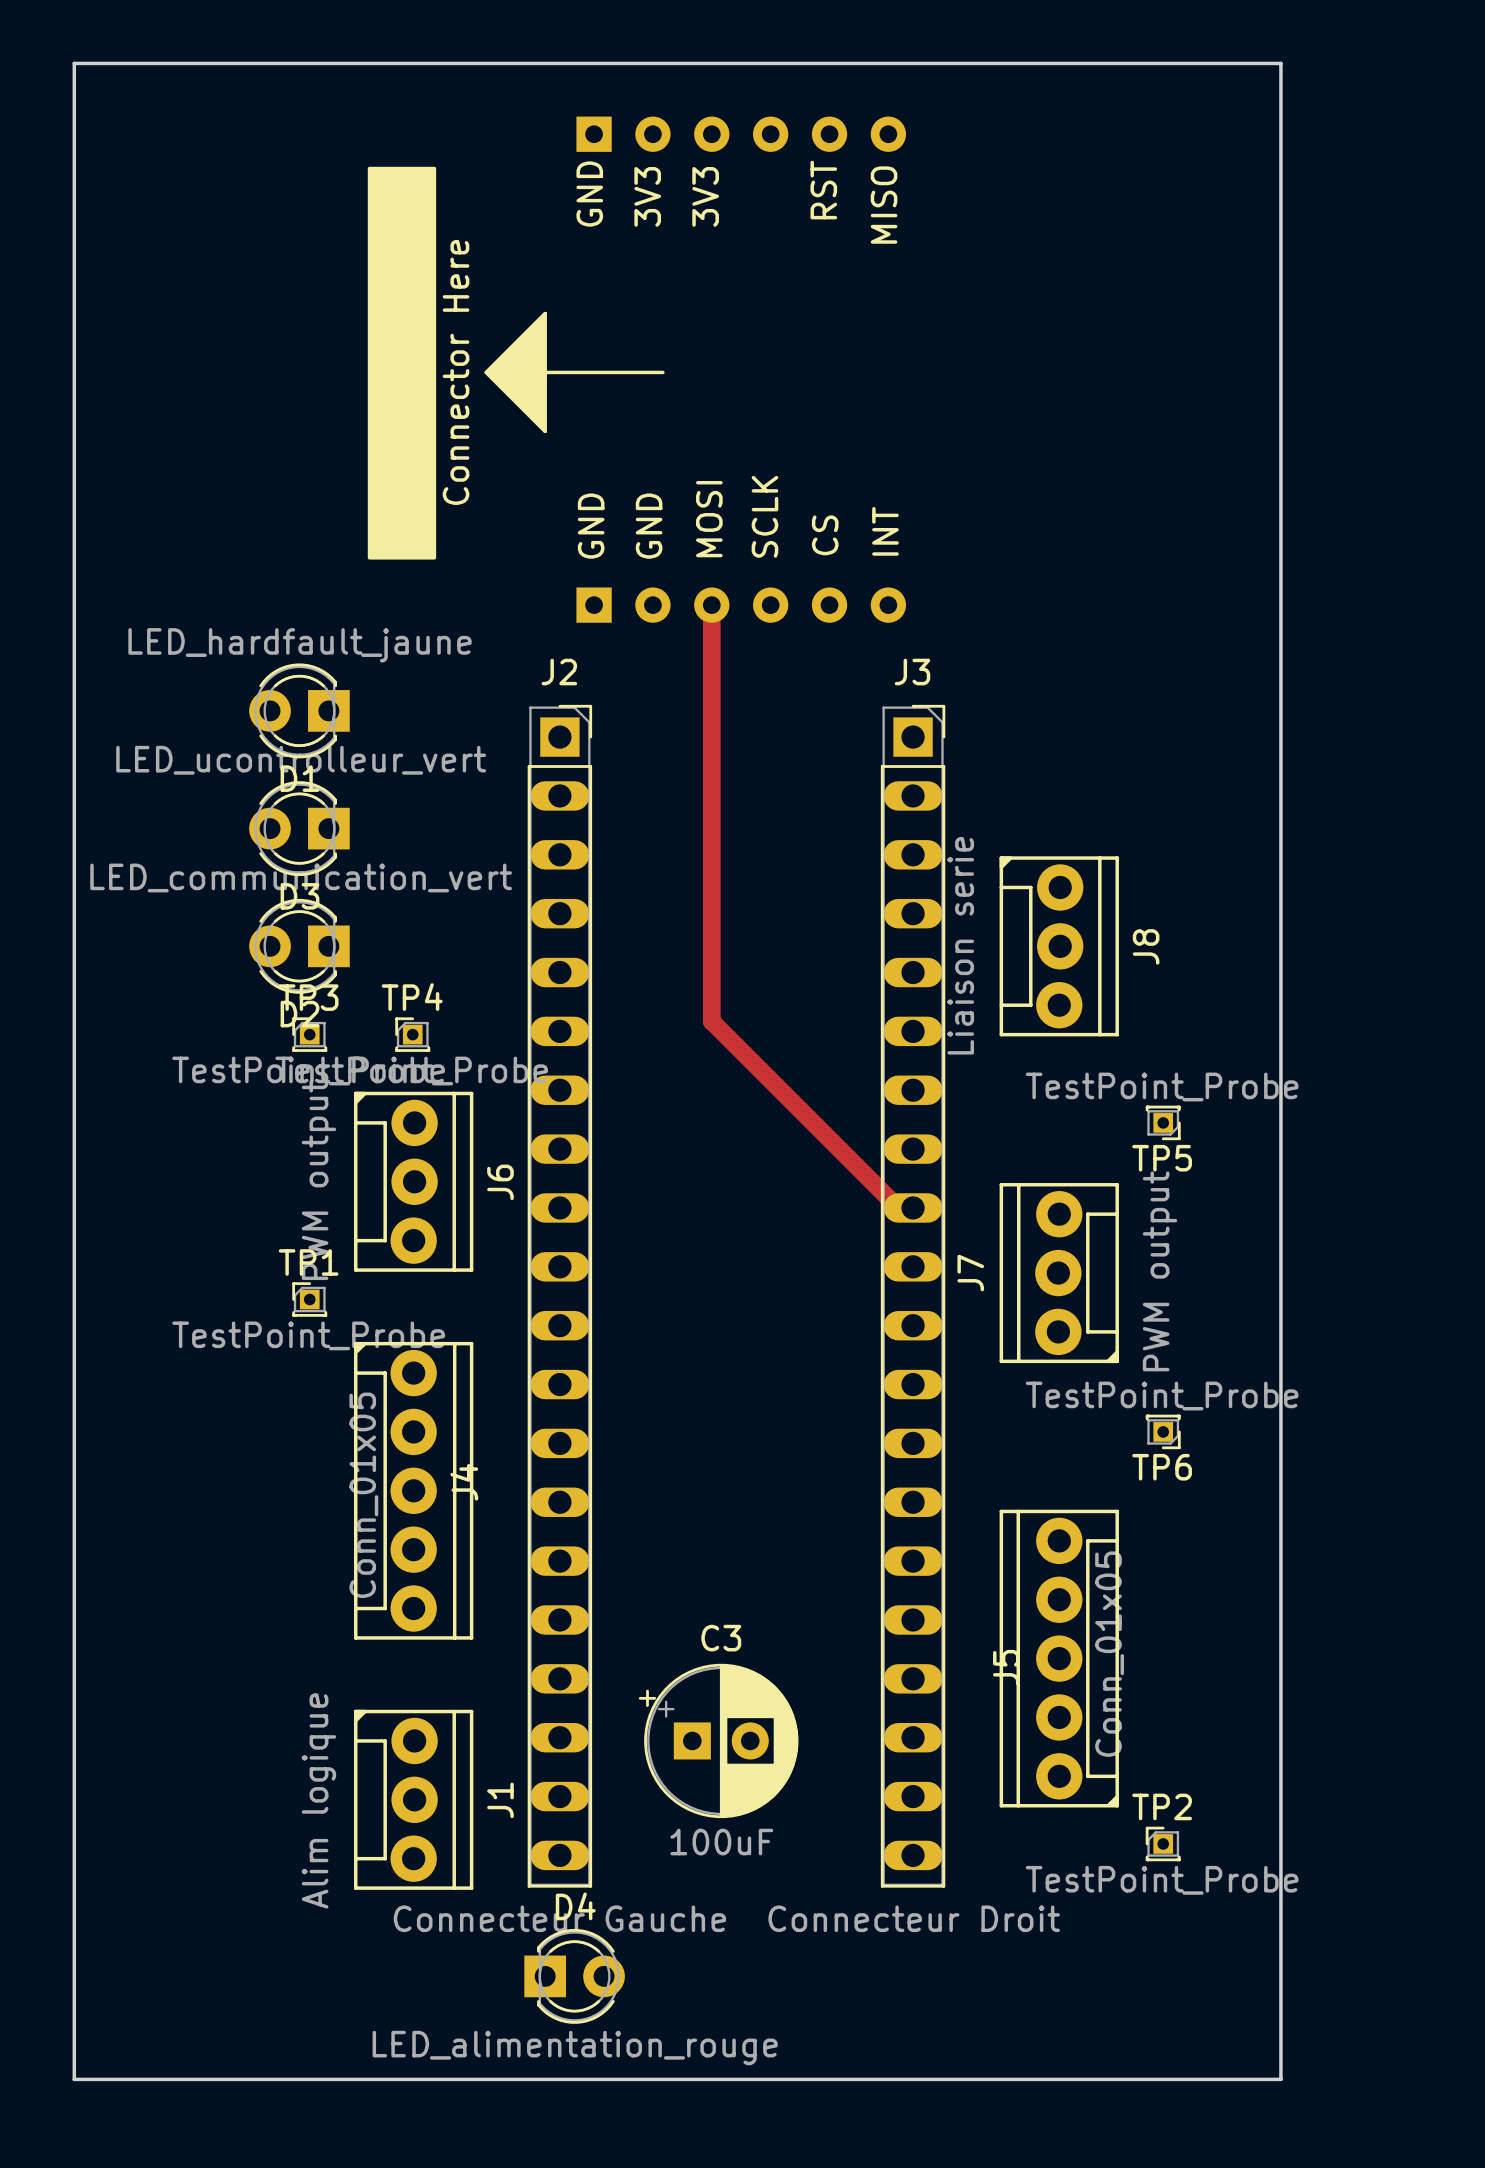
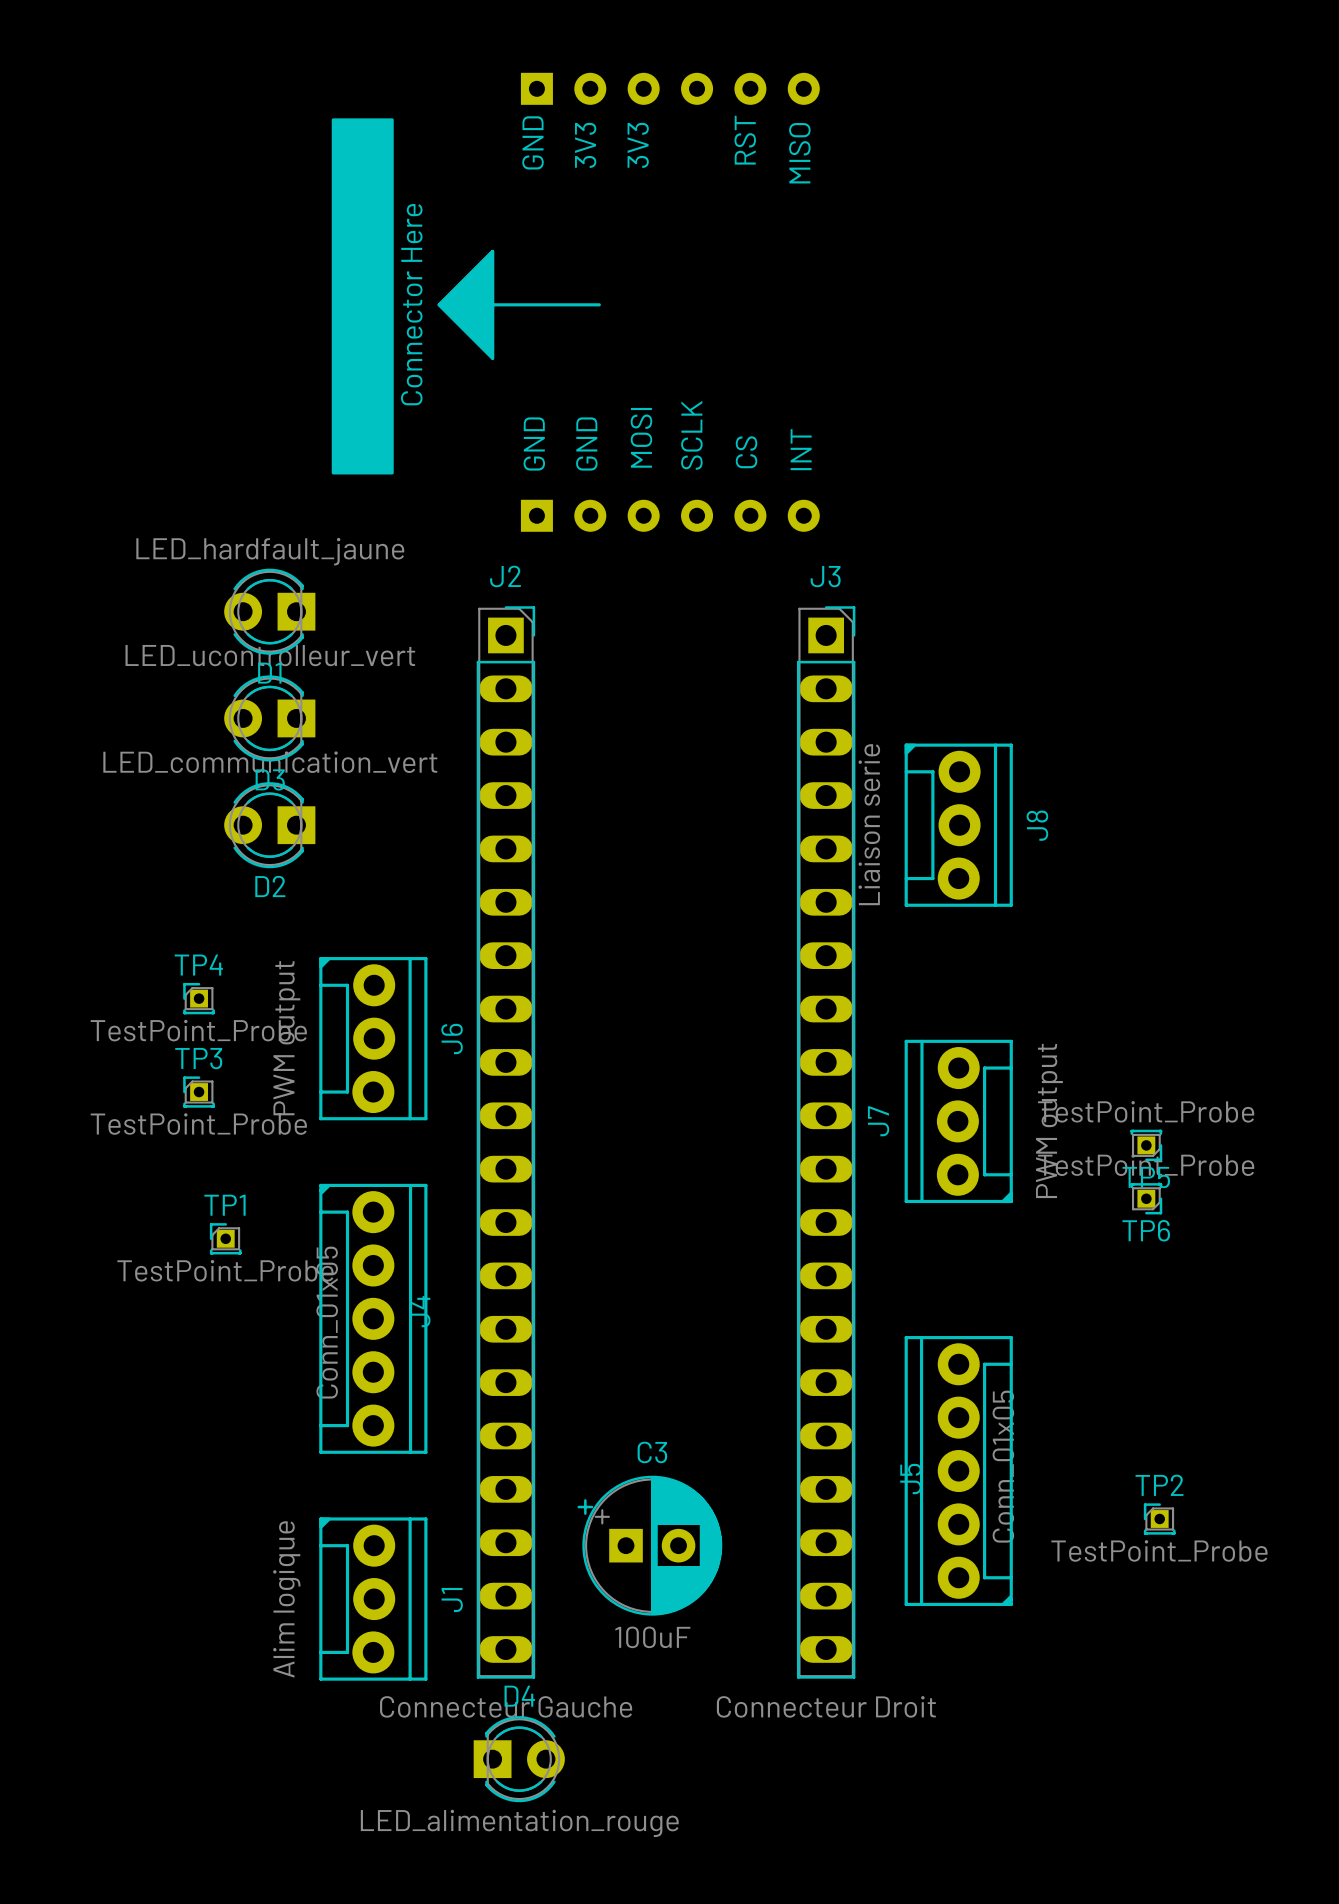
board edge: (74, 63) (1280, 63) (1280, 2079) (74, 2079) (74, 63) -> none
track: (711, 605) (711, 1021) (898, 1207) (913, 1207) -> none
TP3 position: (309, 1034) -> (199, 1092)
TP4 position: (412, 1034) -> (199, 998)
TP5 position: (1163, 1122) -> (1146, 1145)
TP1 position: (309, 1299) -> (225, 1238)
TP6 position: (1163, 1431) -> (1146, 1198)
TP2 position: (1163, 1843) -> (1159, 1518)

